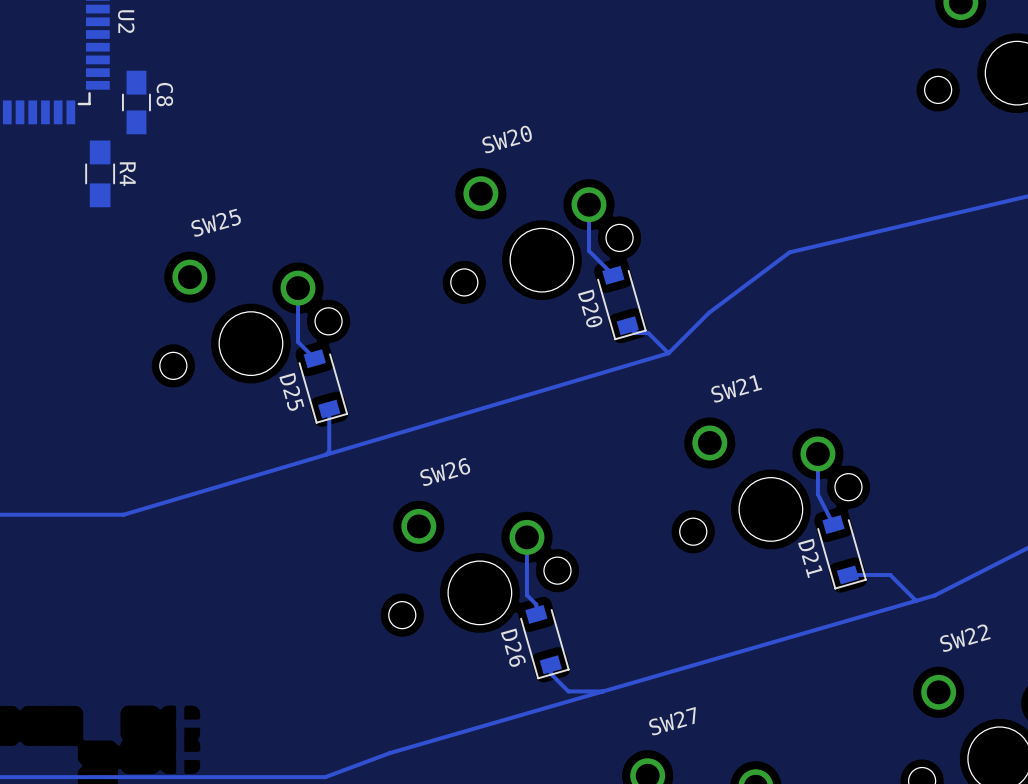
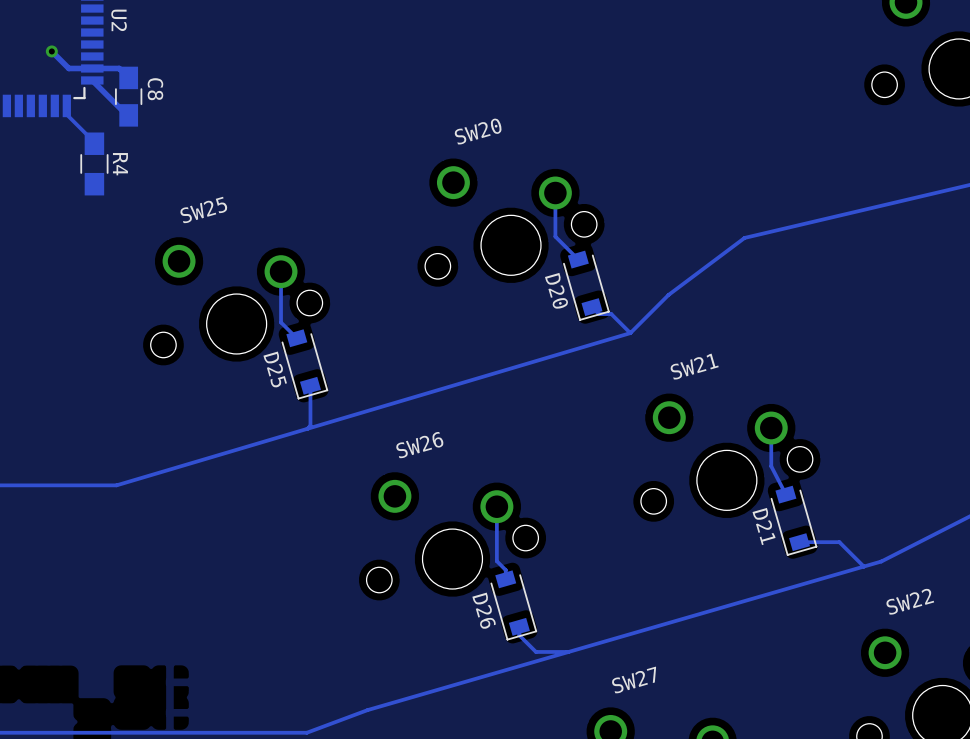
track: none -> (51, 51) (68, 68) (119, 68) (128, 77)
via: none -> (51, 51)
track: none -> (92, 80) (128, 115)
track: none -> (66, 105) (66, 114) (94, 143)

